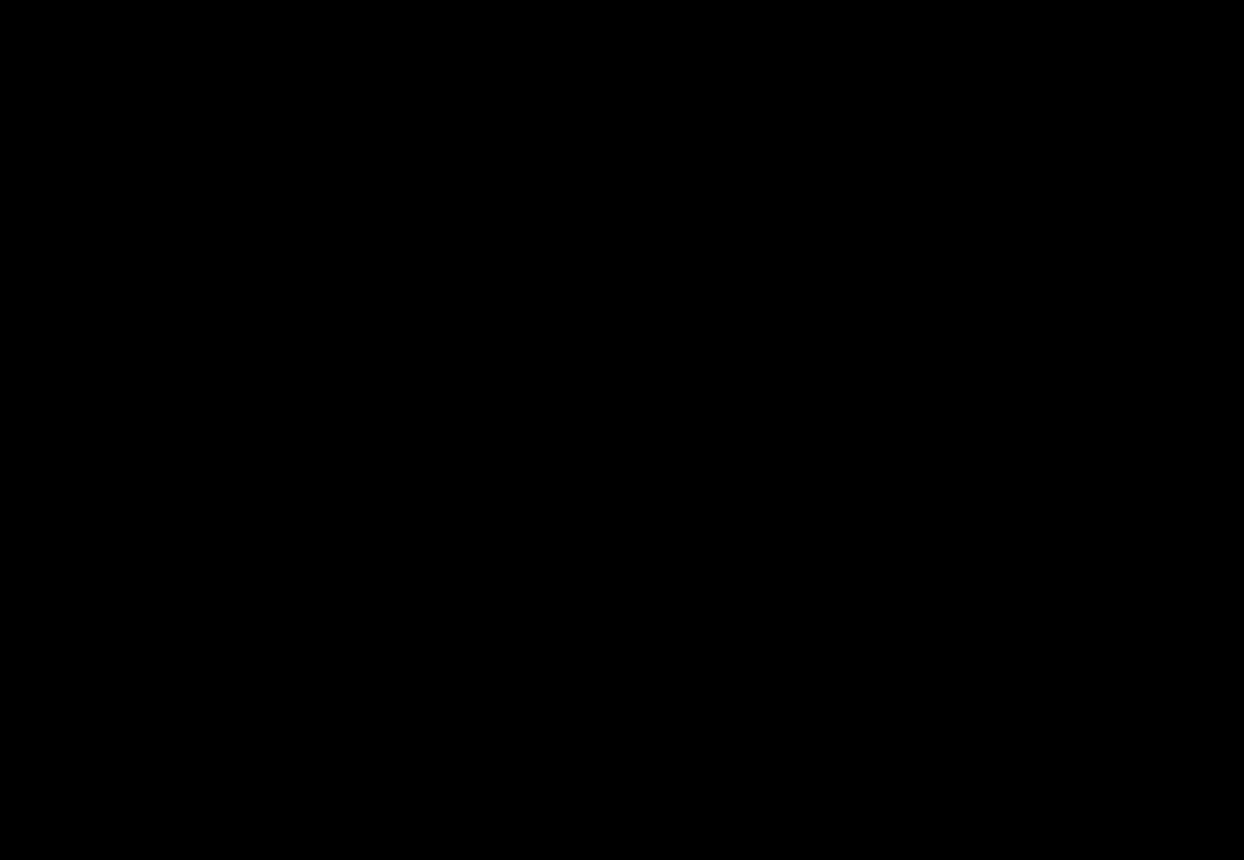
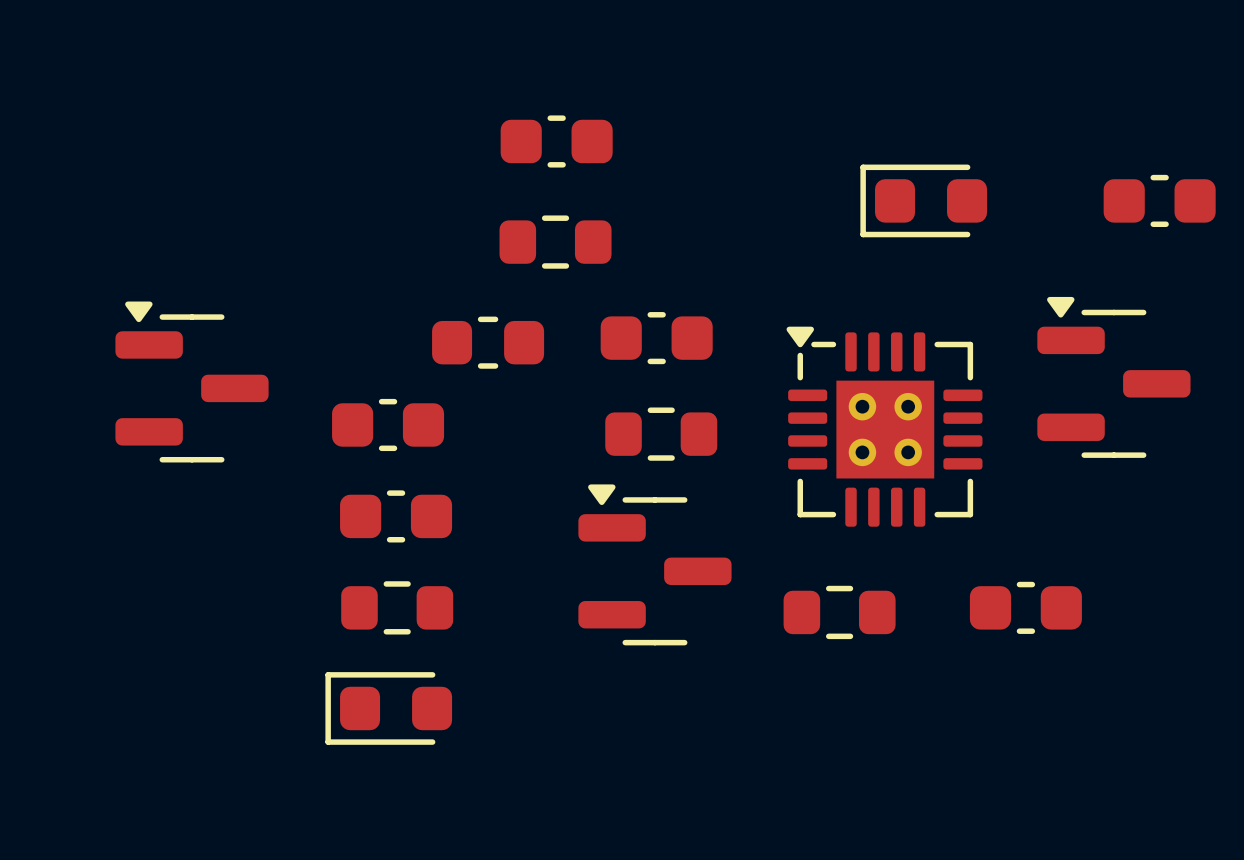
part: none -> (556, 141)
part: none -> (923, 200)
part: none -> (1159, 200)
part: none -> (555, 242)
part: none -> (656, 338)
part: none -> (488, 342)
part: none -> (1113, 377)
part: none -> (192, 381)
part: none -> (388, 424)
part: none -> (884, 426)
part: none -> (661, 434)
part: none -> (396, 516)
part: none -> (654, 564)
part: none -> (397, 607)
part: none -> (1025, 607)
part: none -> (839, 612)
part: none -> (388, 708)

